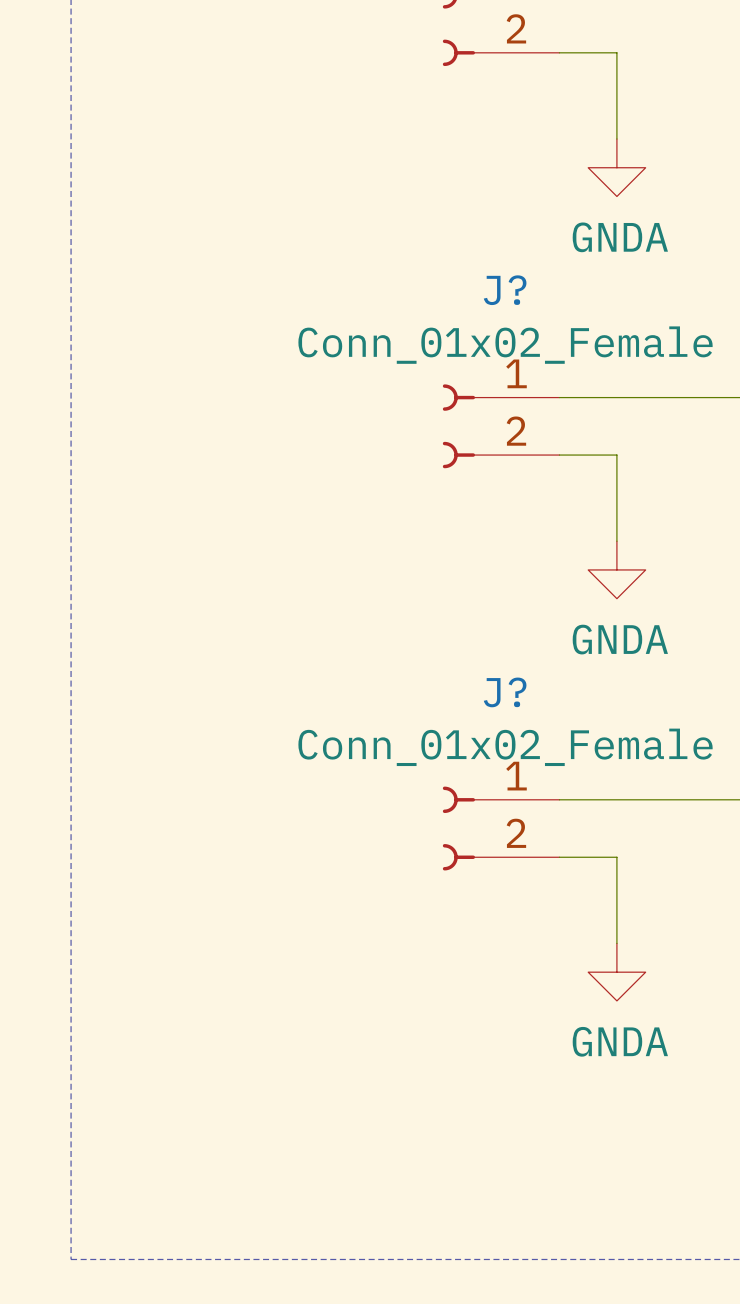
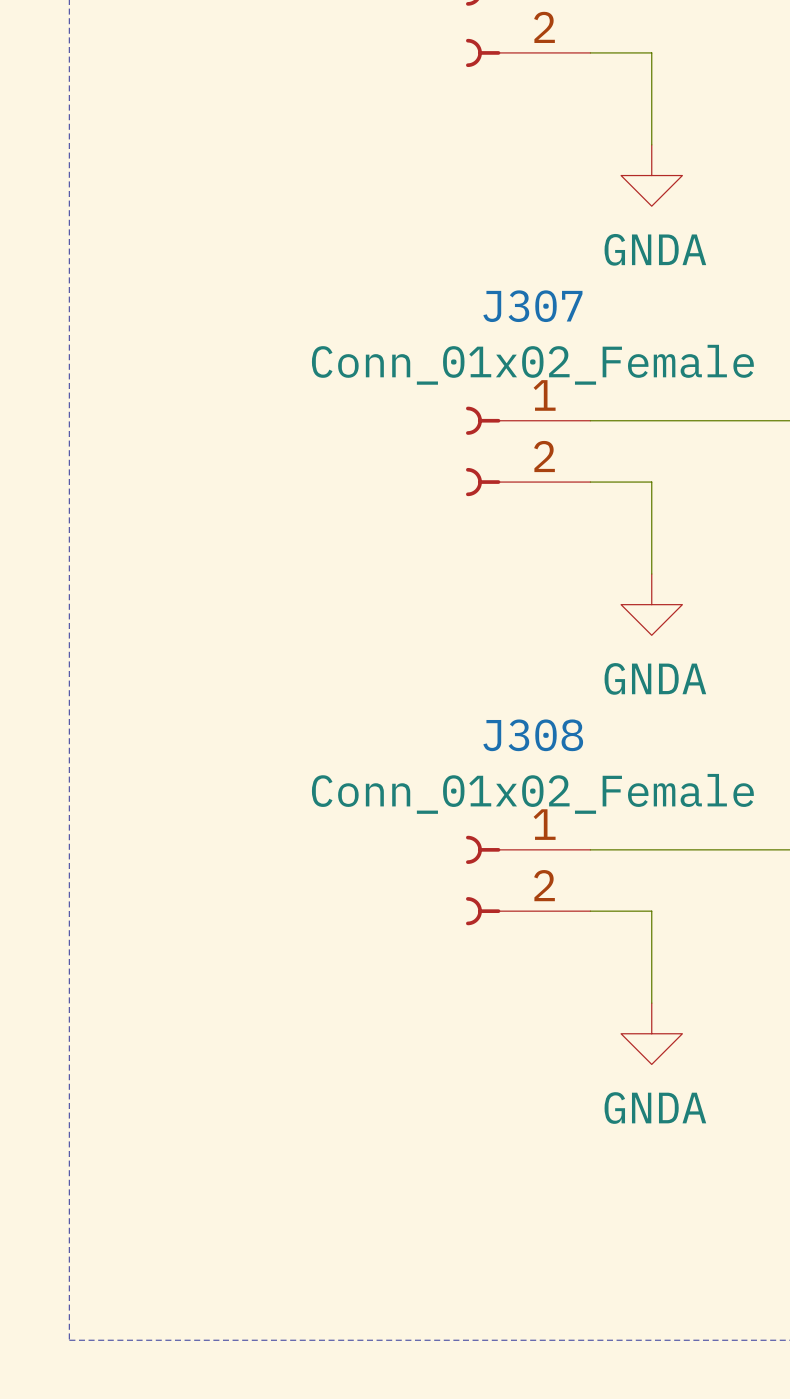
J? name: J? (505, 290) -> J307 (532, 306)
J? name: J? (505, 692) -> J308 (533, 735)

